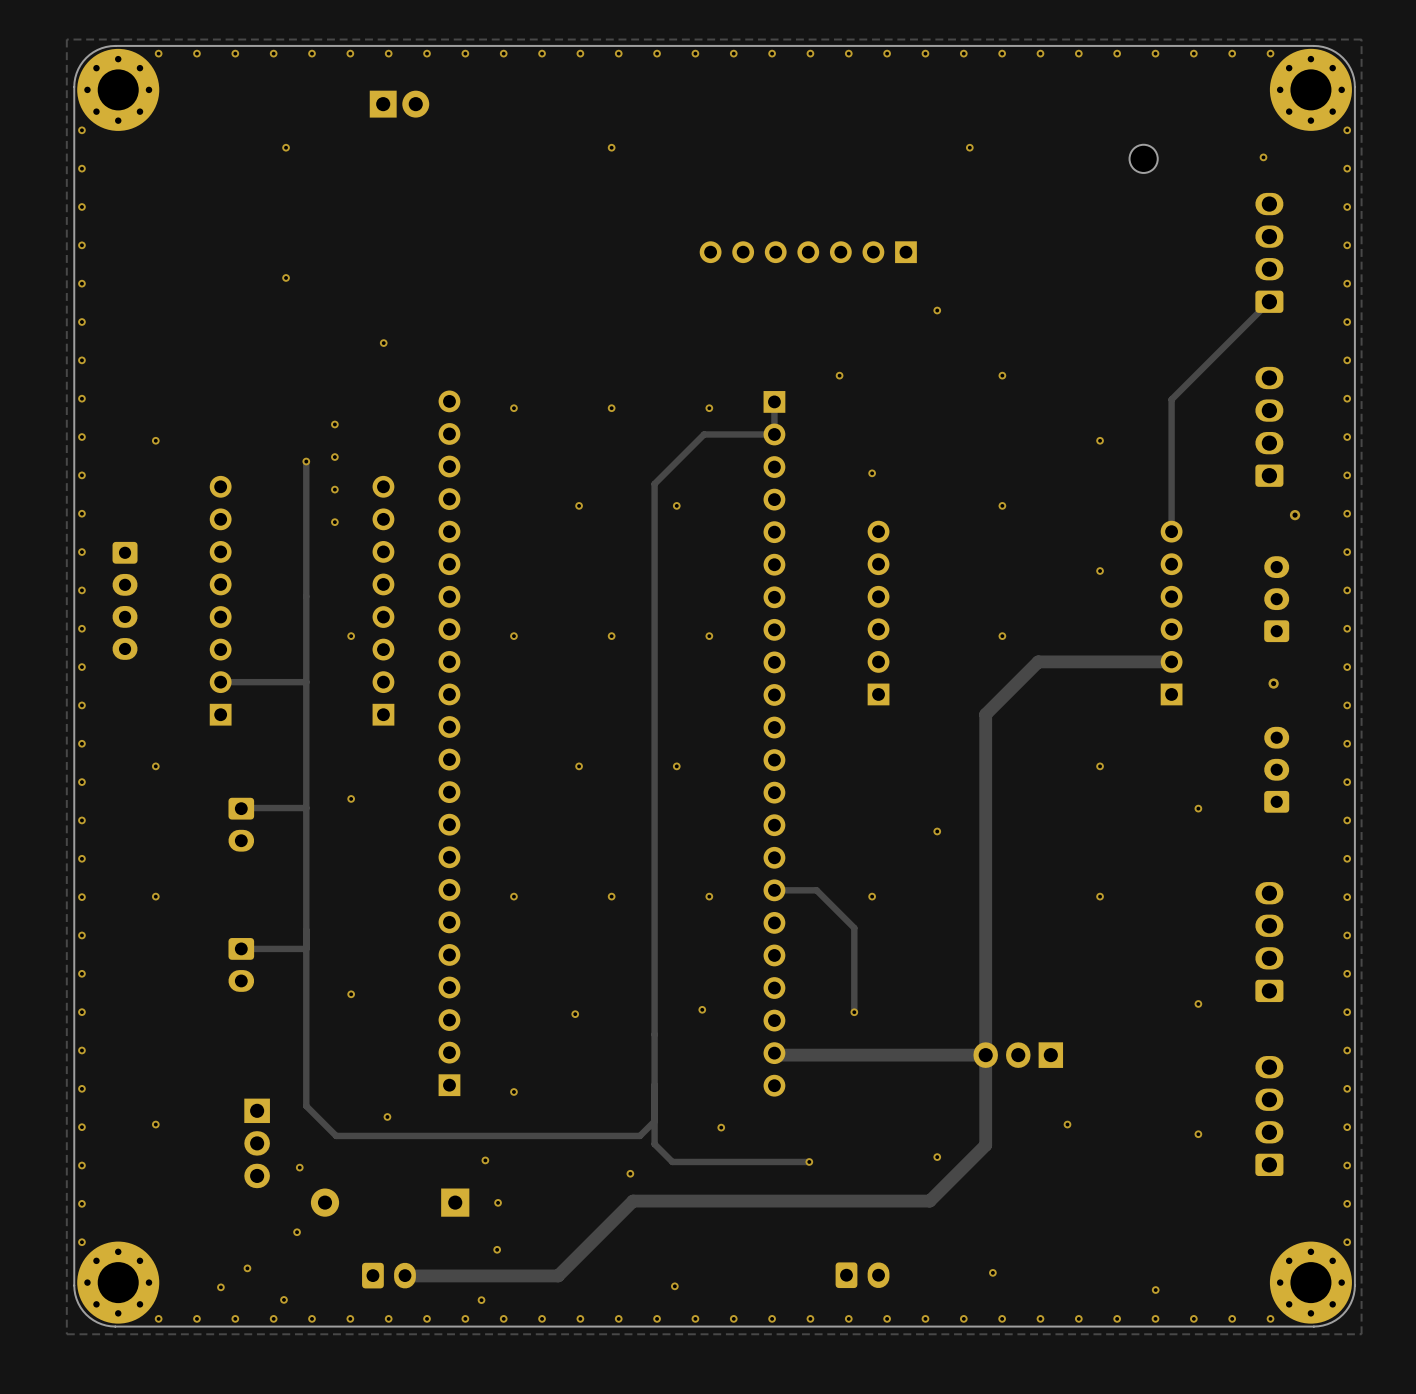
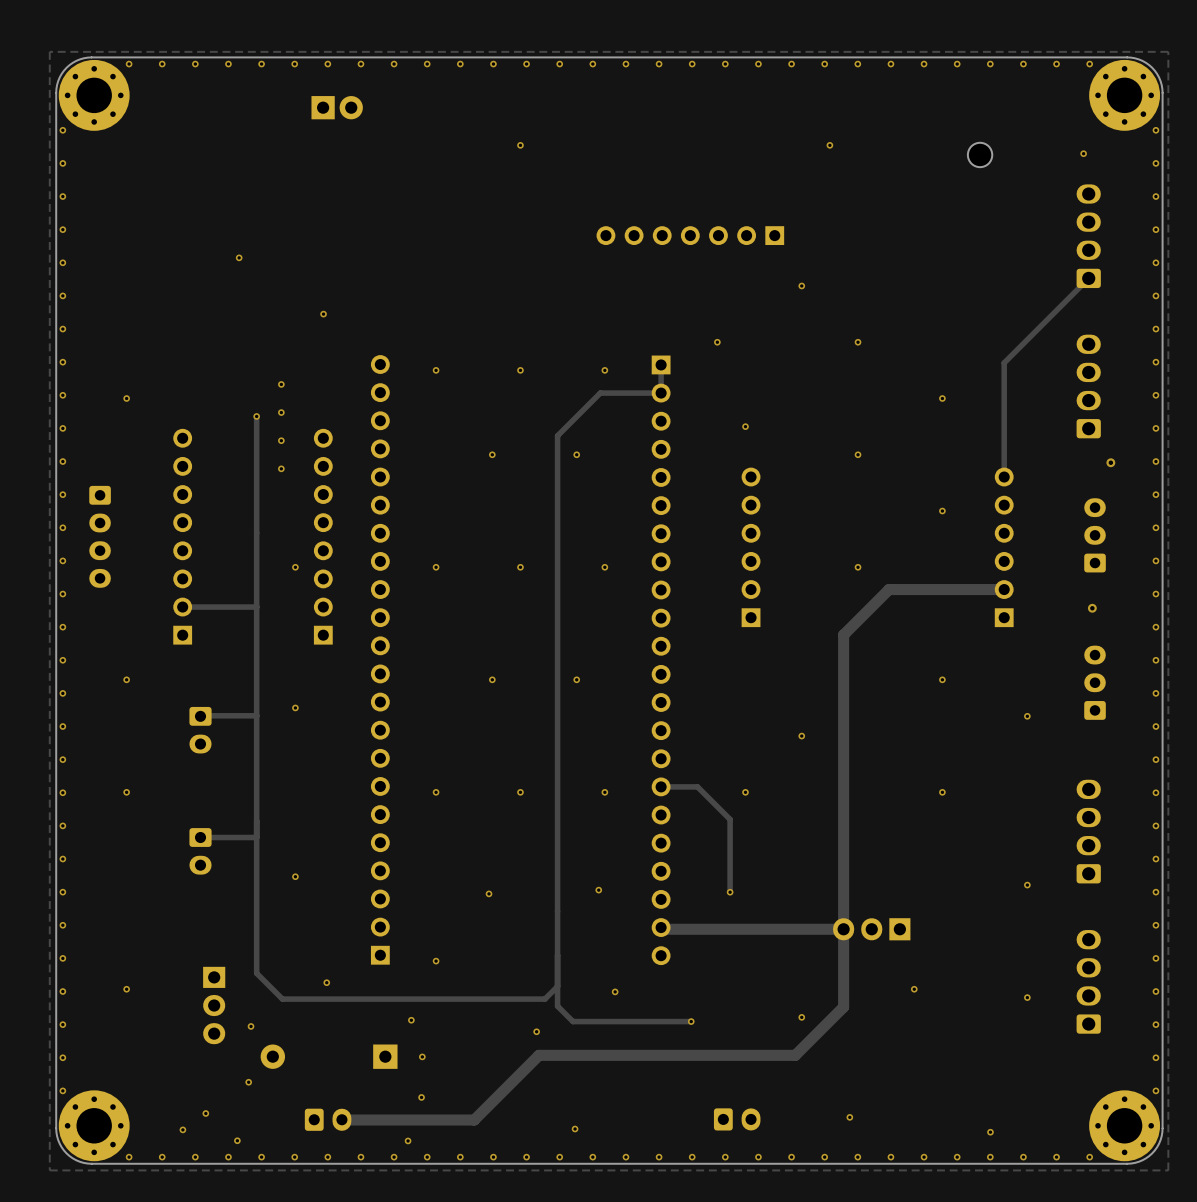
via: (286, 147) -> none

